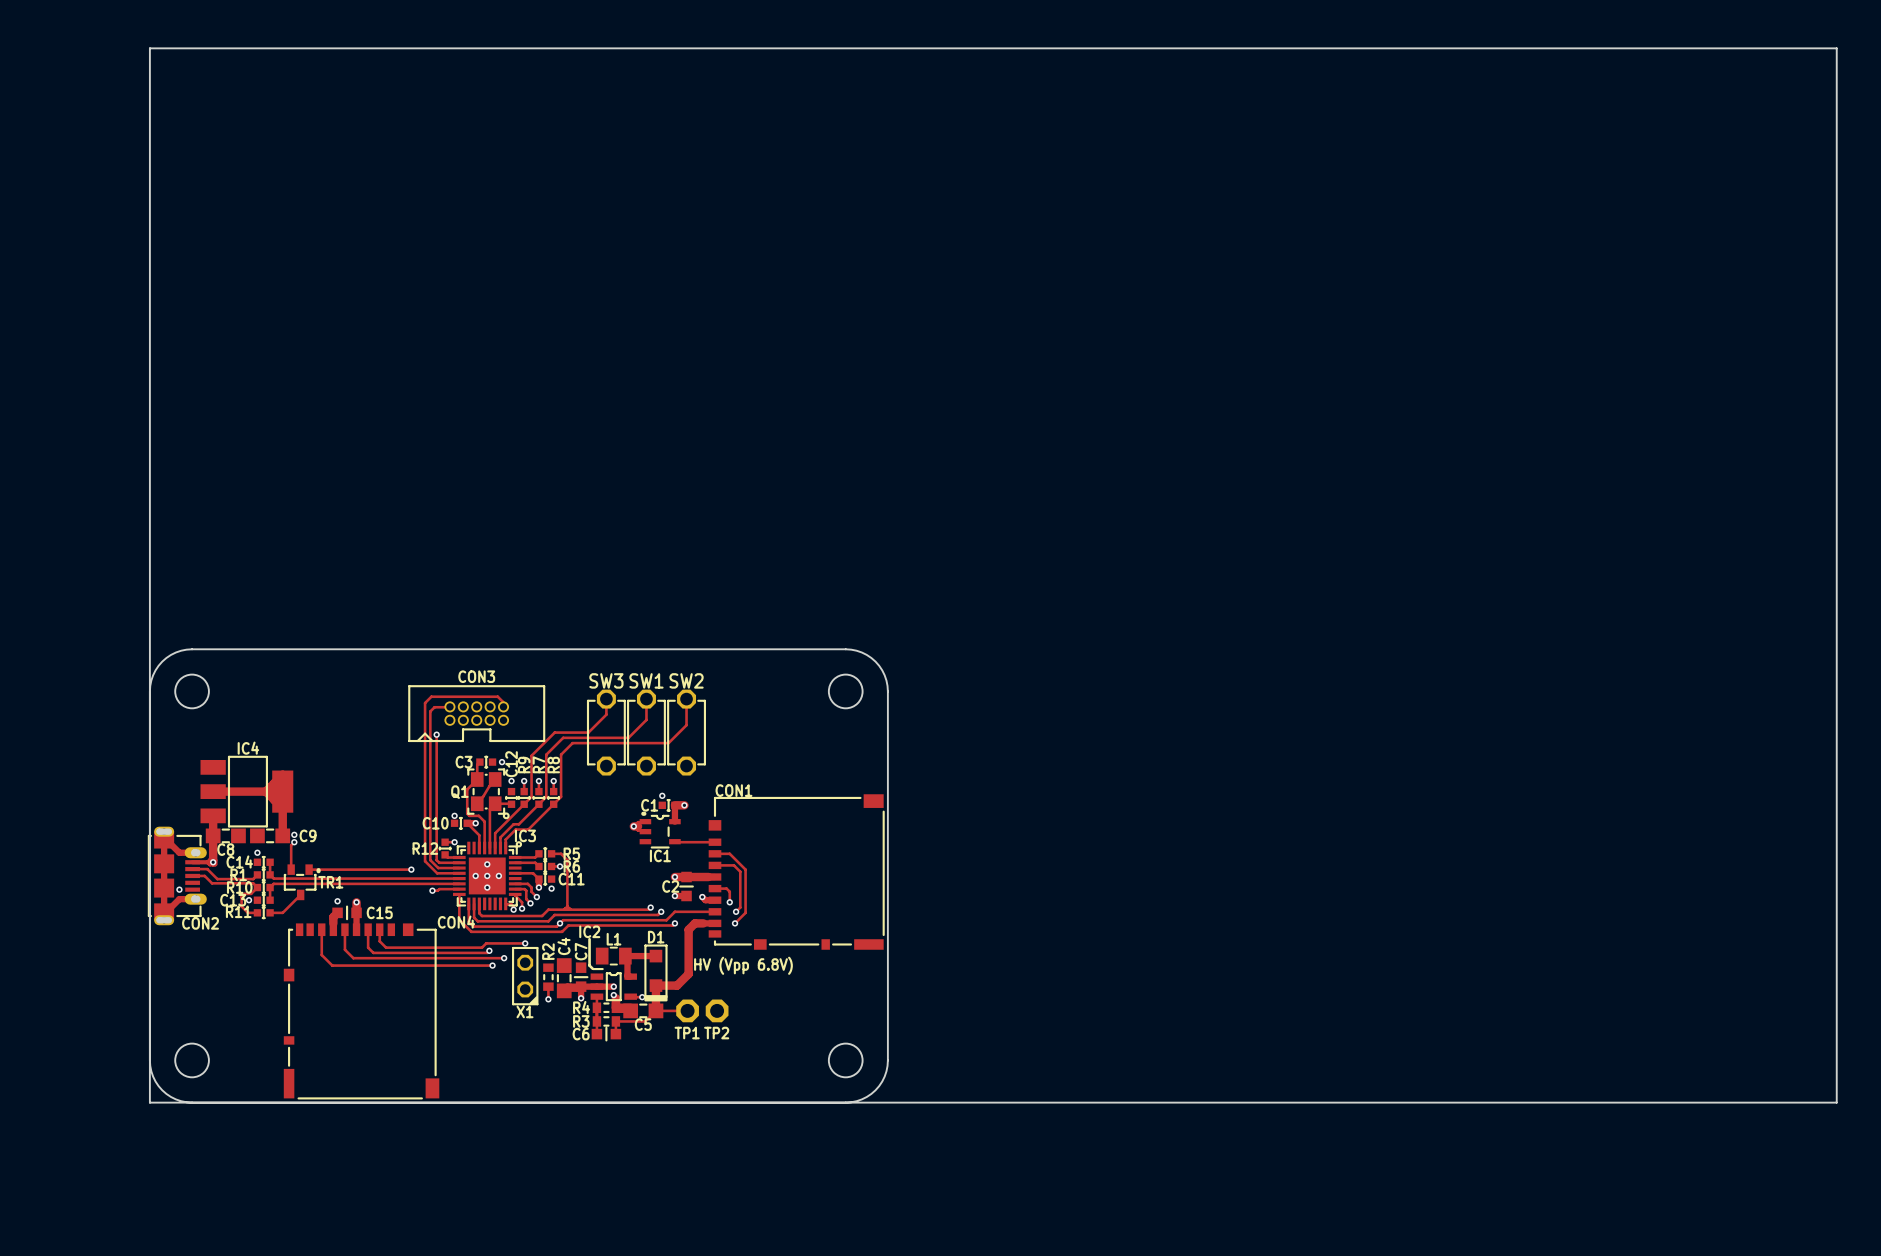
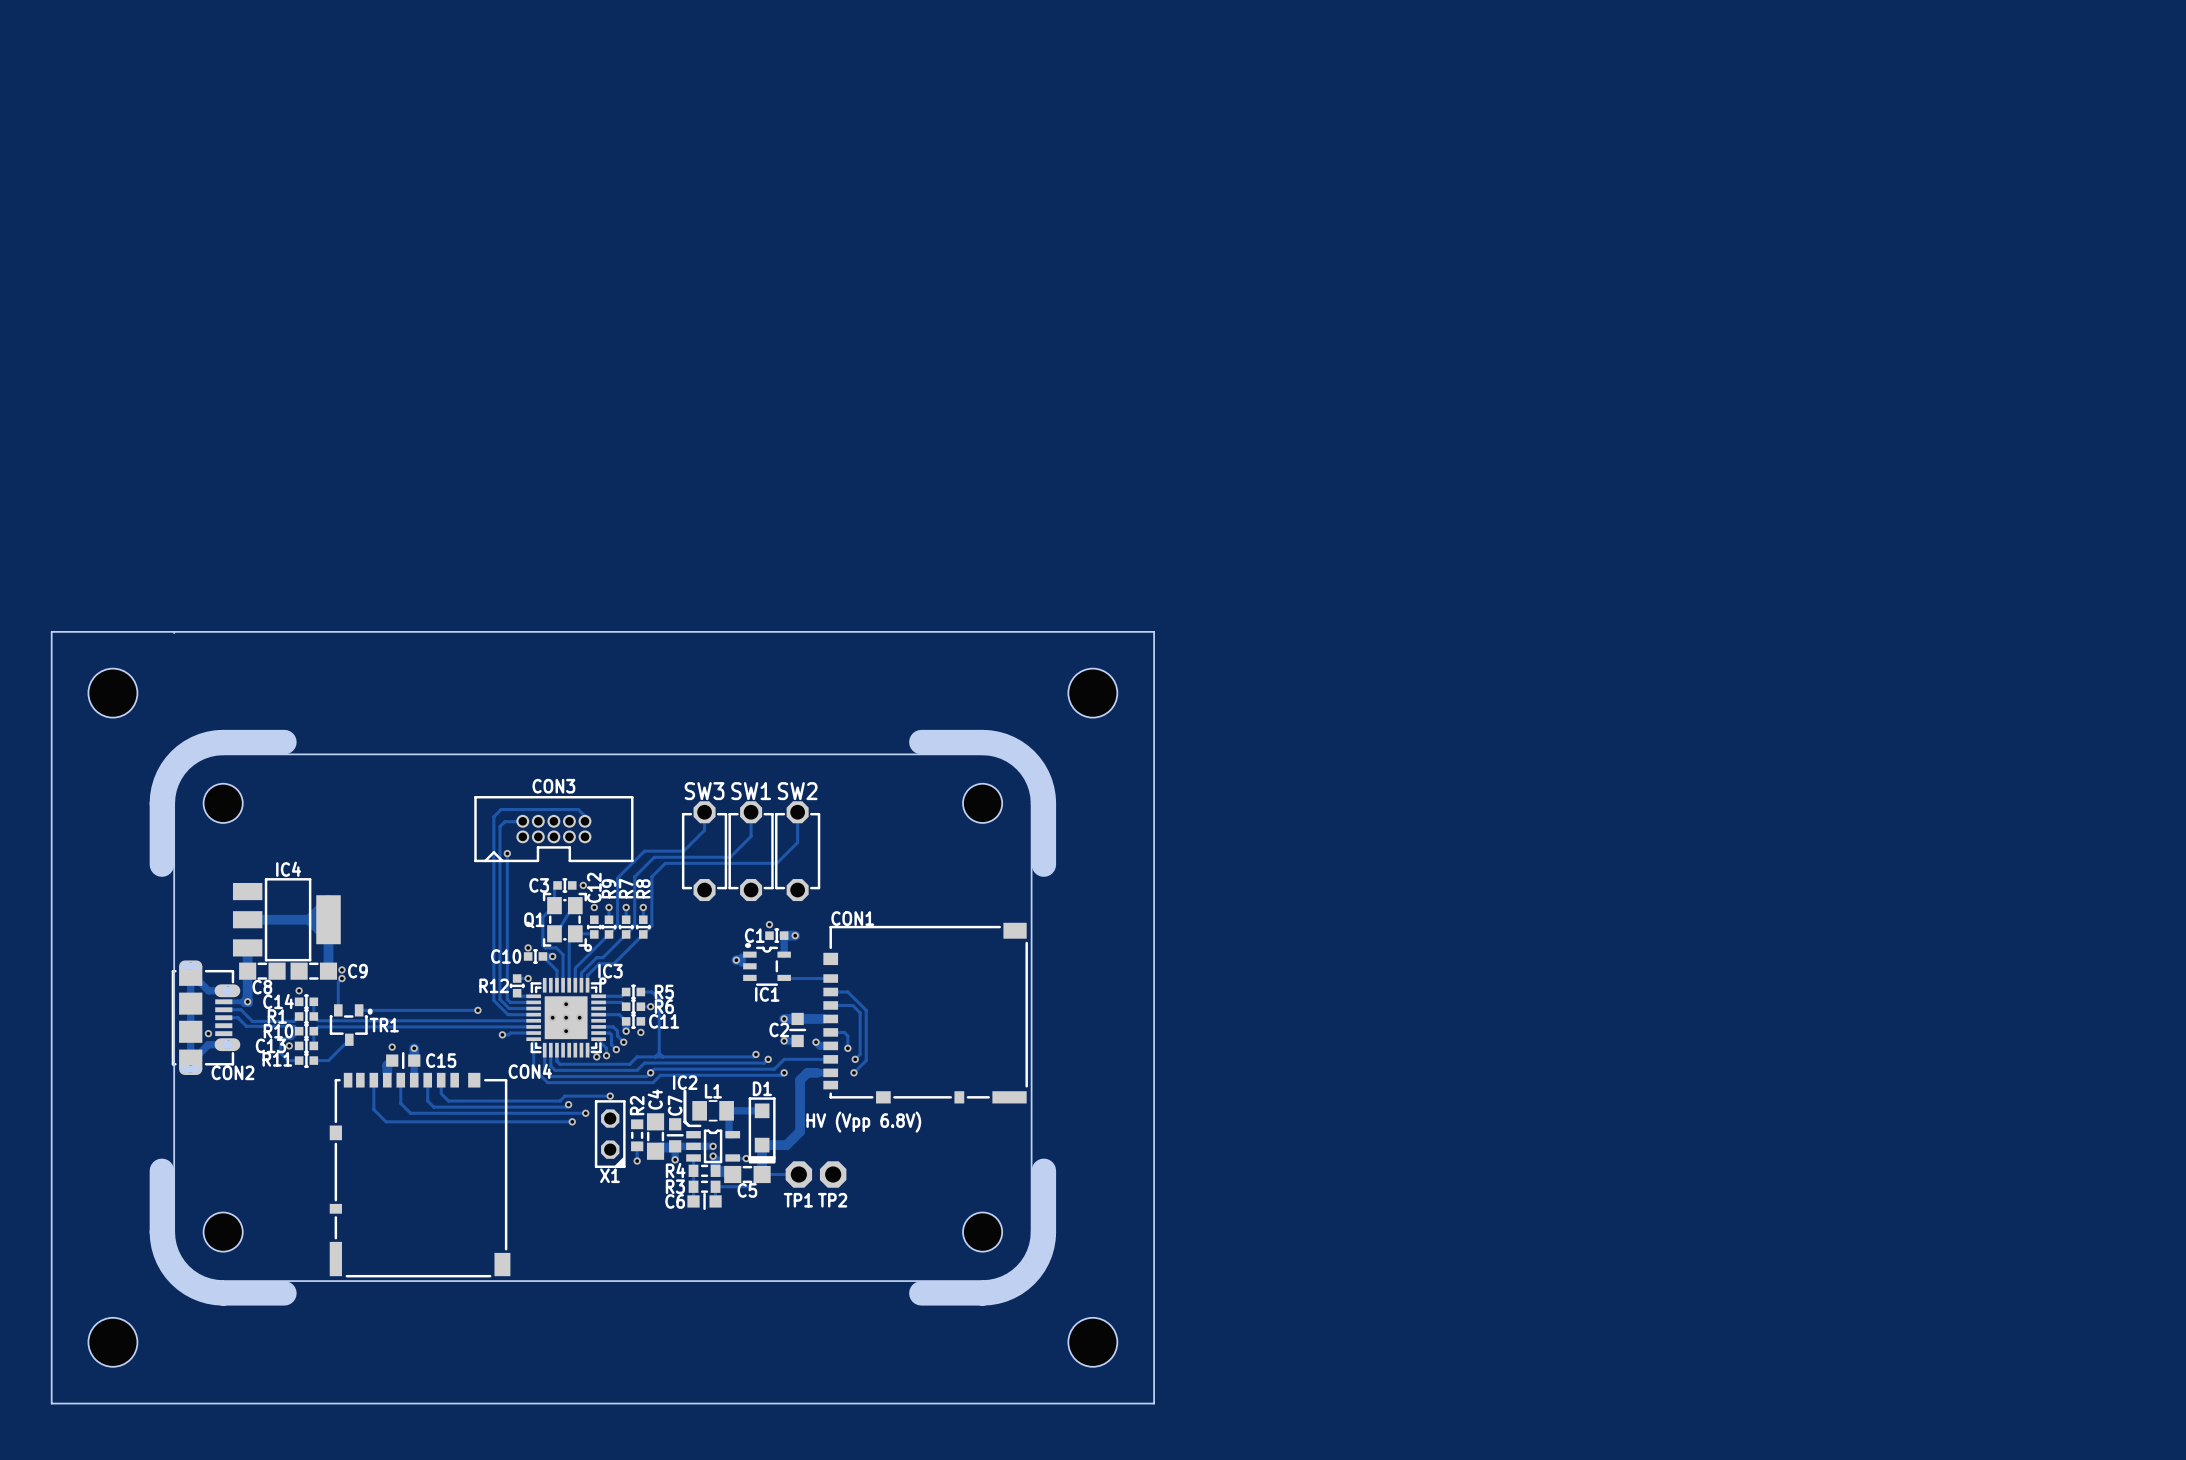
board edge: none -> (51, 631) (1154, 631) (1154, 1403) (51, 1403) (51, 631)
board edge: (149, 543) (149, 48) (1836, 48) (1836, 1102) (149, 1102) (149, 544) -> none
hole: none -> (112, 693)
hole: none -> (1092, 693)
board edge: none -> (284, 742) (209, 743) (190, 751) (179, 760) (171, 770) (163, 789) (161, 864)
board edge: none -> (921, 742) (996, 743) (1015, 751) (1025, 760) (1034, 770) (1042, 789) (1043, 864)
board edge: none -> (161, 1170) (163, 1245) (171, 1264) (179, 1275) (190, 1283) (209, 1291) (284, 1293)
board edge: none -> (1043, 1170) (1042, 1245) (1034, 1264) (1025, 1275) (1015, 1283) (996, 1291) (921, 1293)
hole: none -> (112, 1342)
hole: none -> (1092, 1342)

